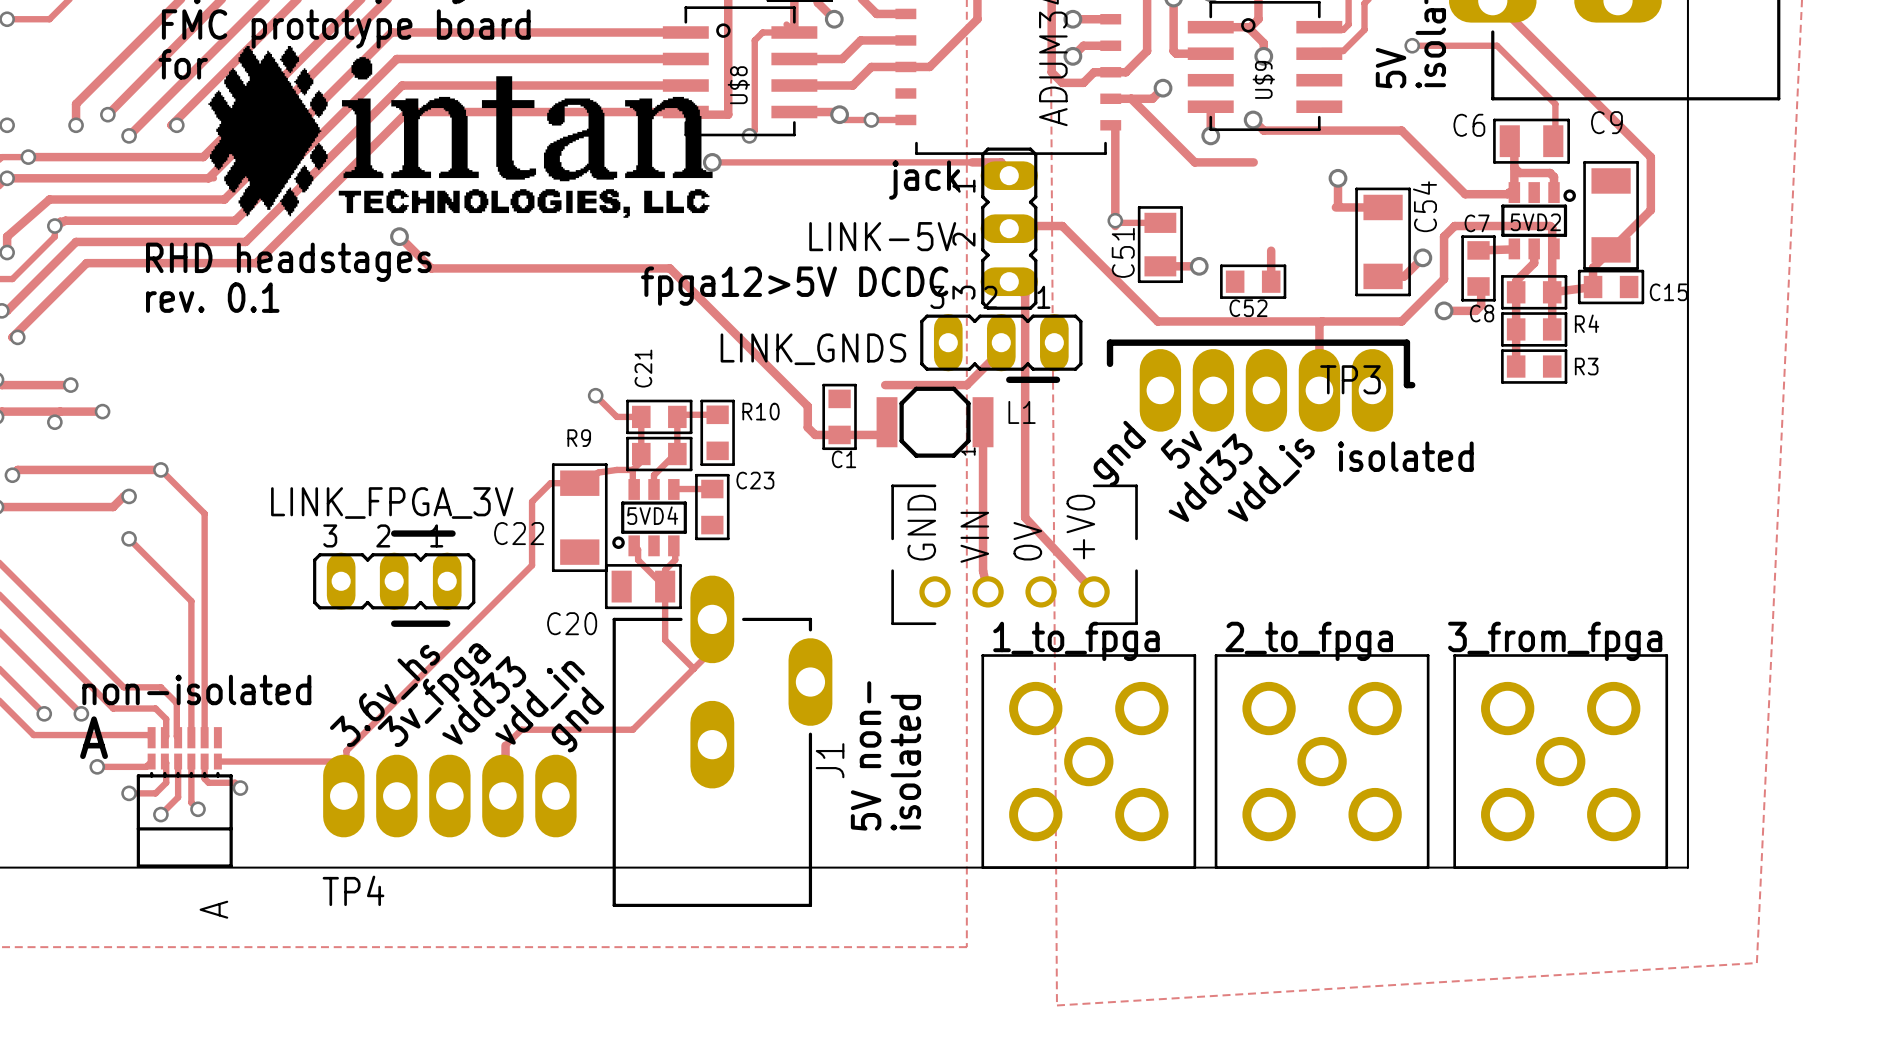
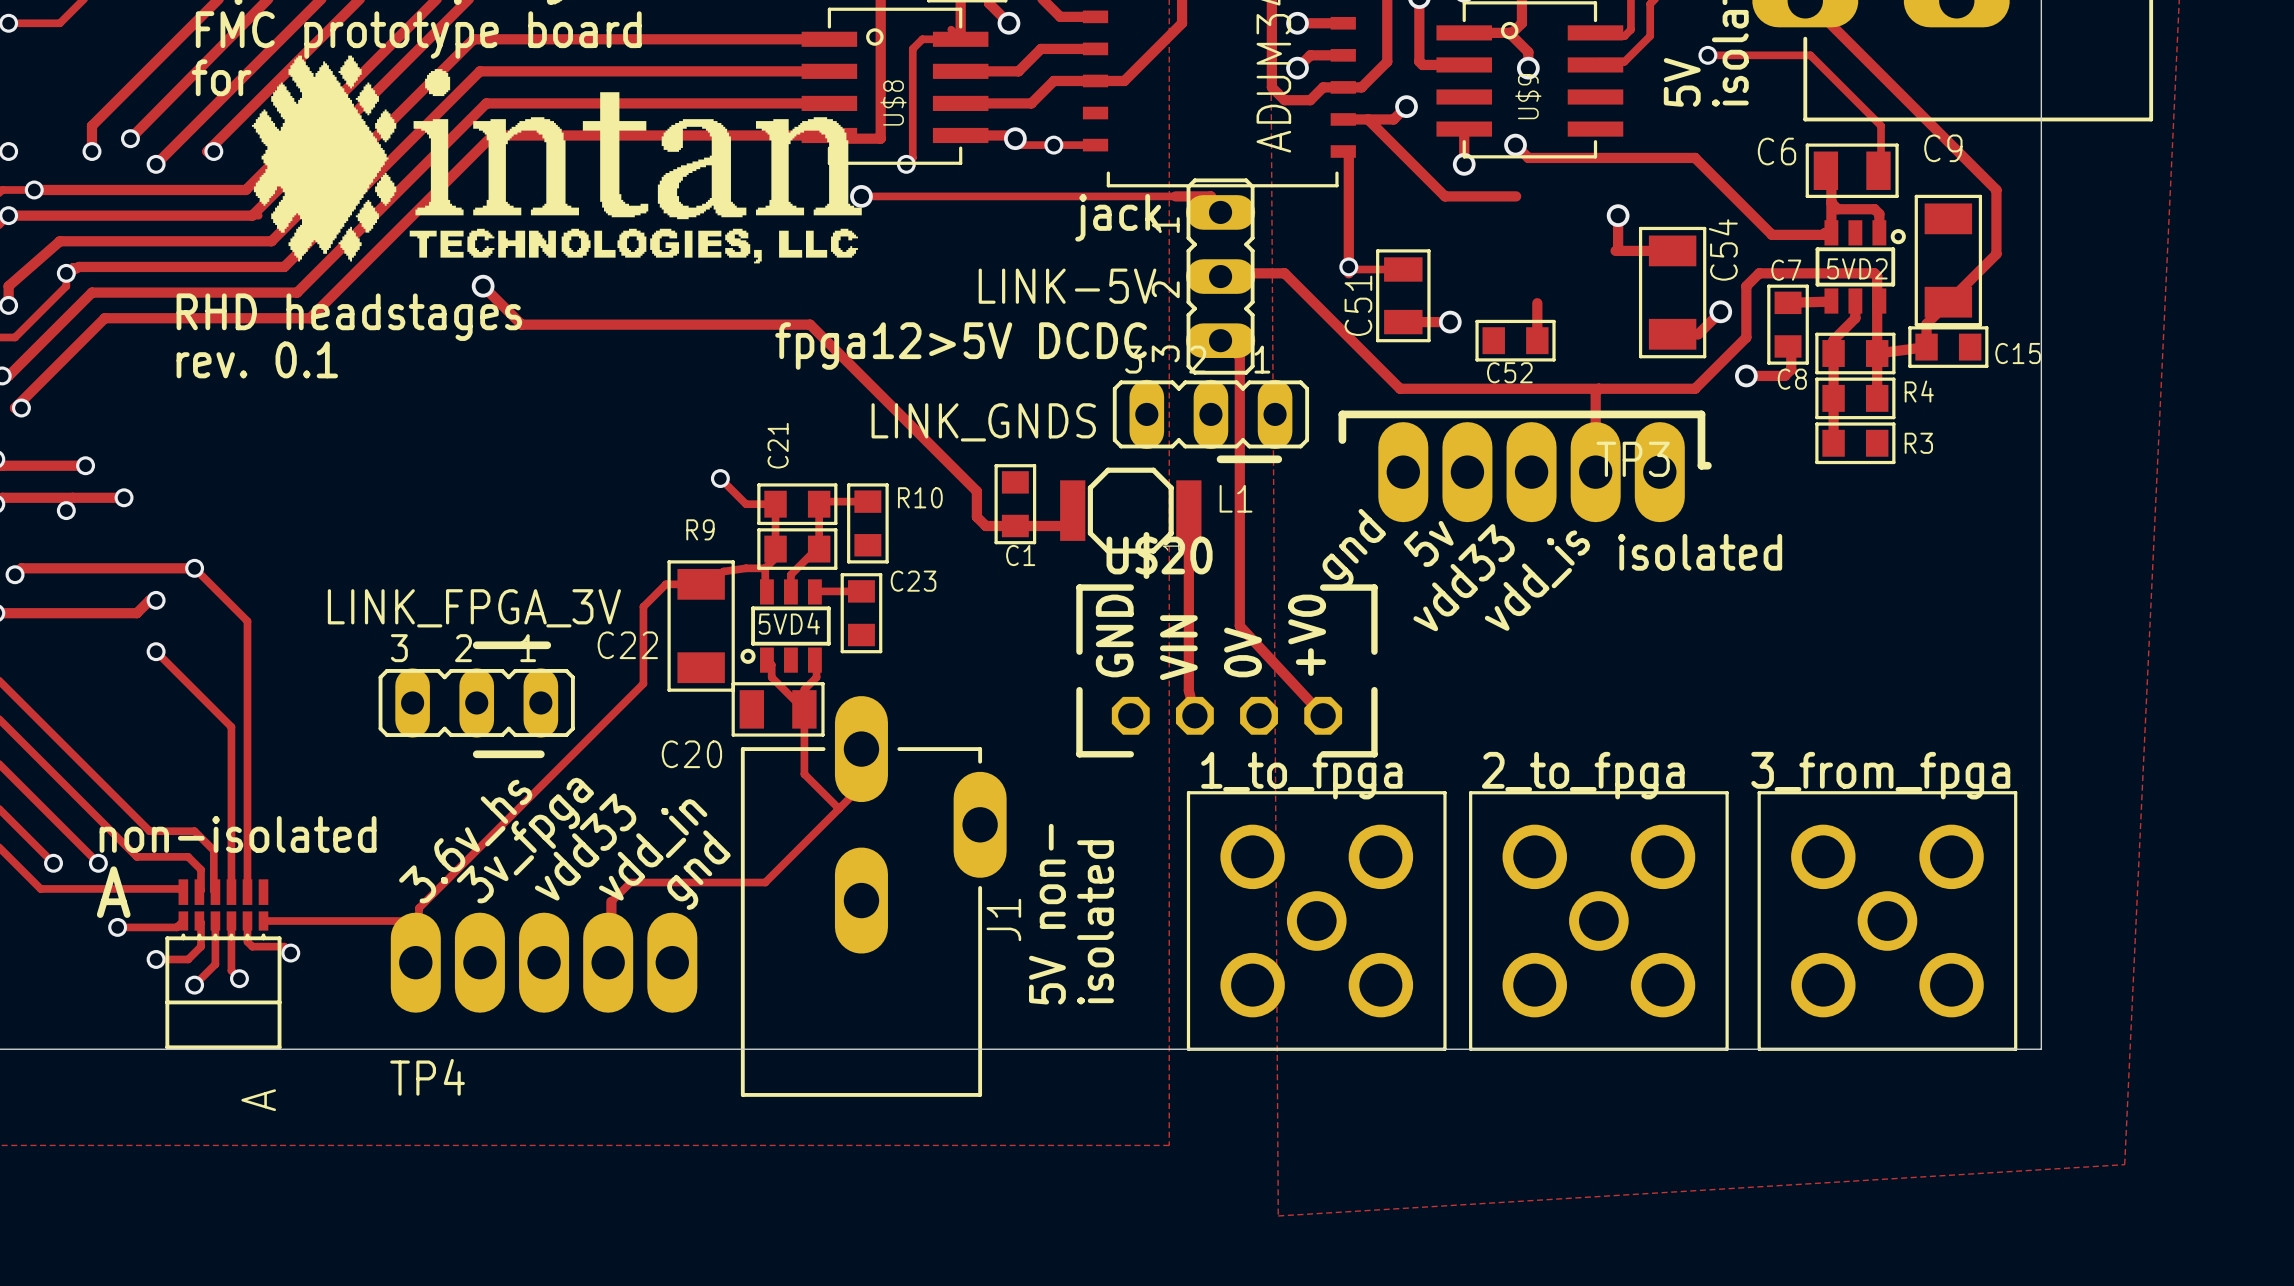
track: (1001, 342) (1001, 350) (966, 385) (885, 385) -> none
part: (1014, 554) -> none
U$20: none -> (1226, 670)

